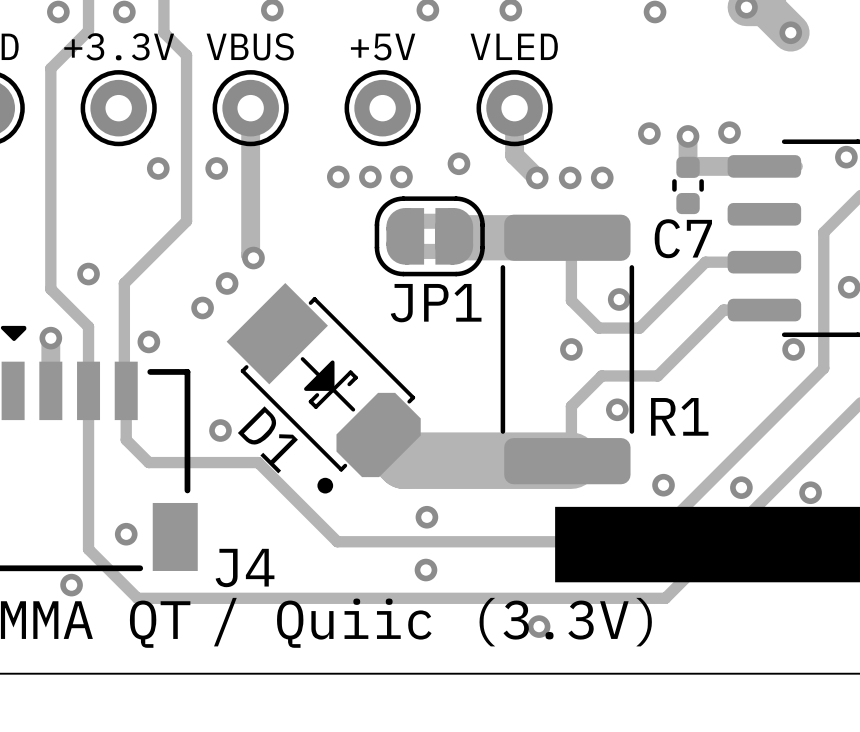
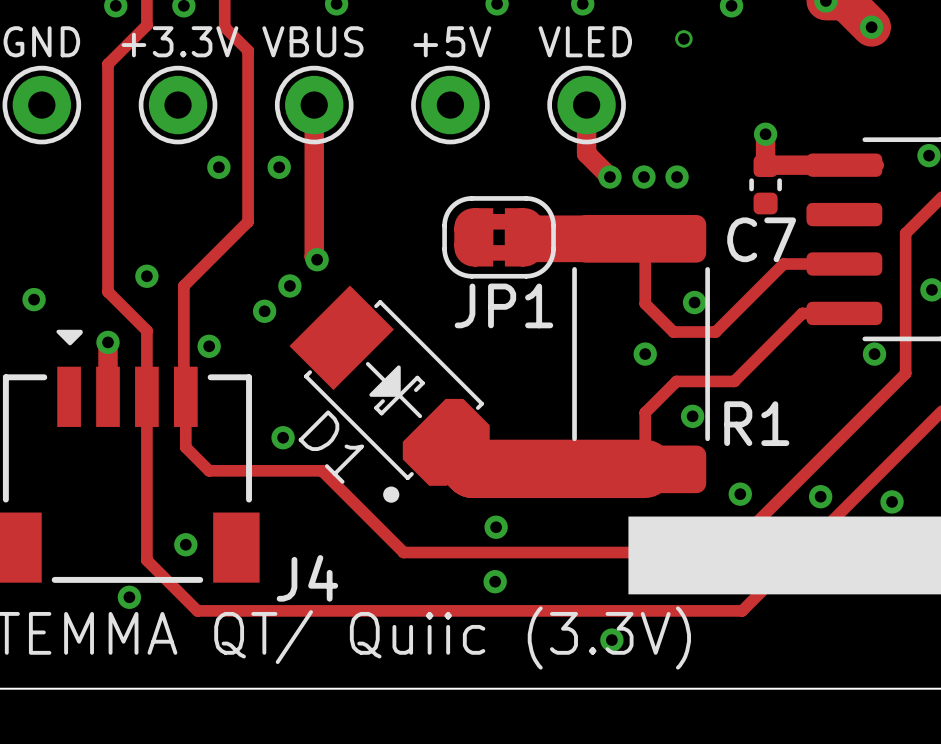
via: none -> (683, 38)
via: (729, 132) -> none
via: (649, 133) -> none
via: (458, 163) -> none
via: (338, 176) -> none
via: (370, 176) -> none
via: (401, 176) -> none

